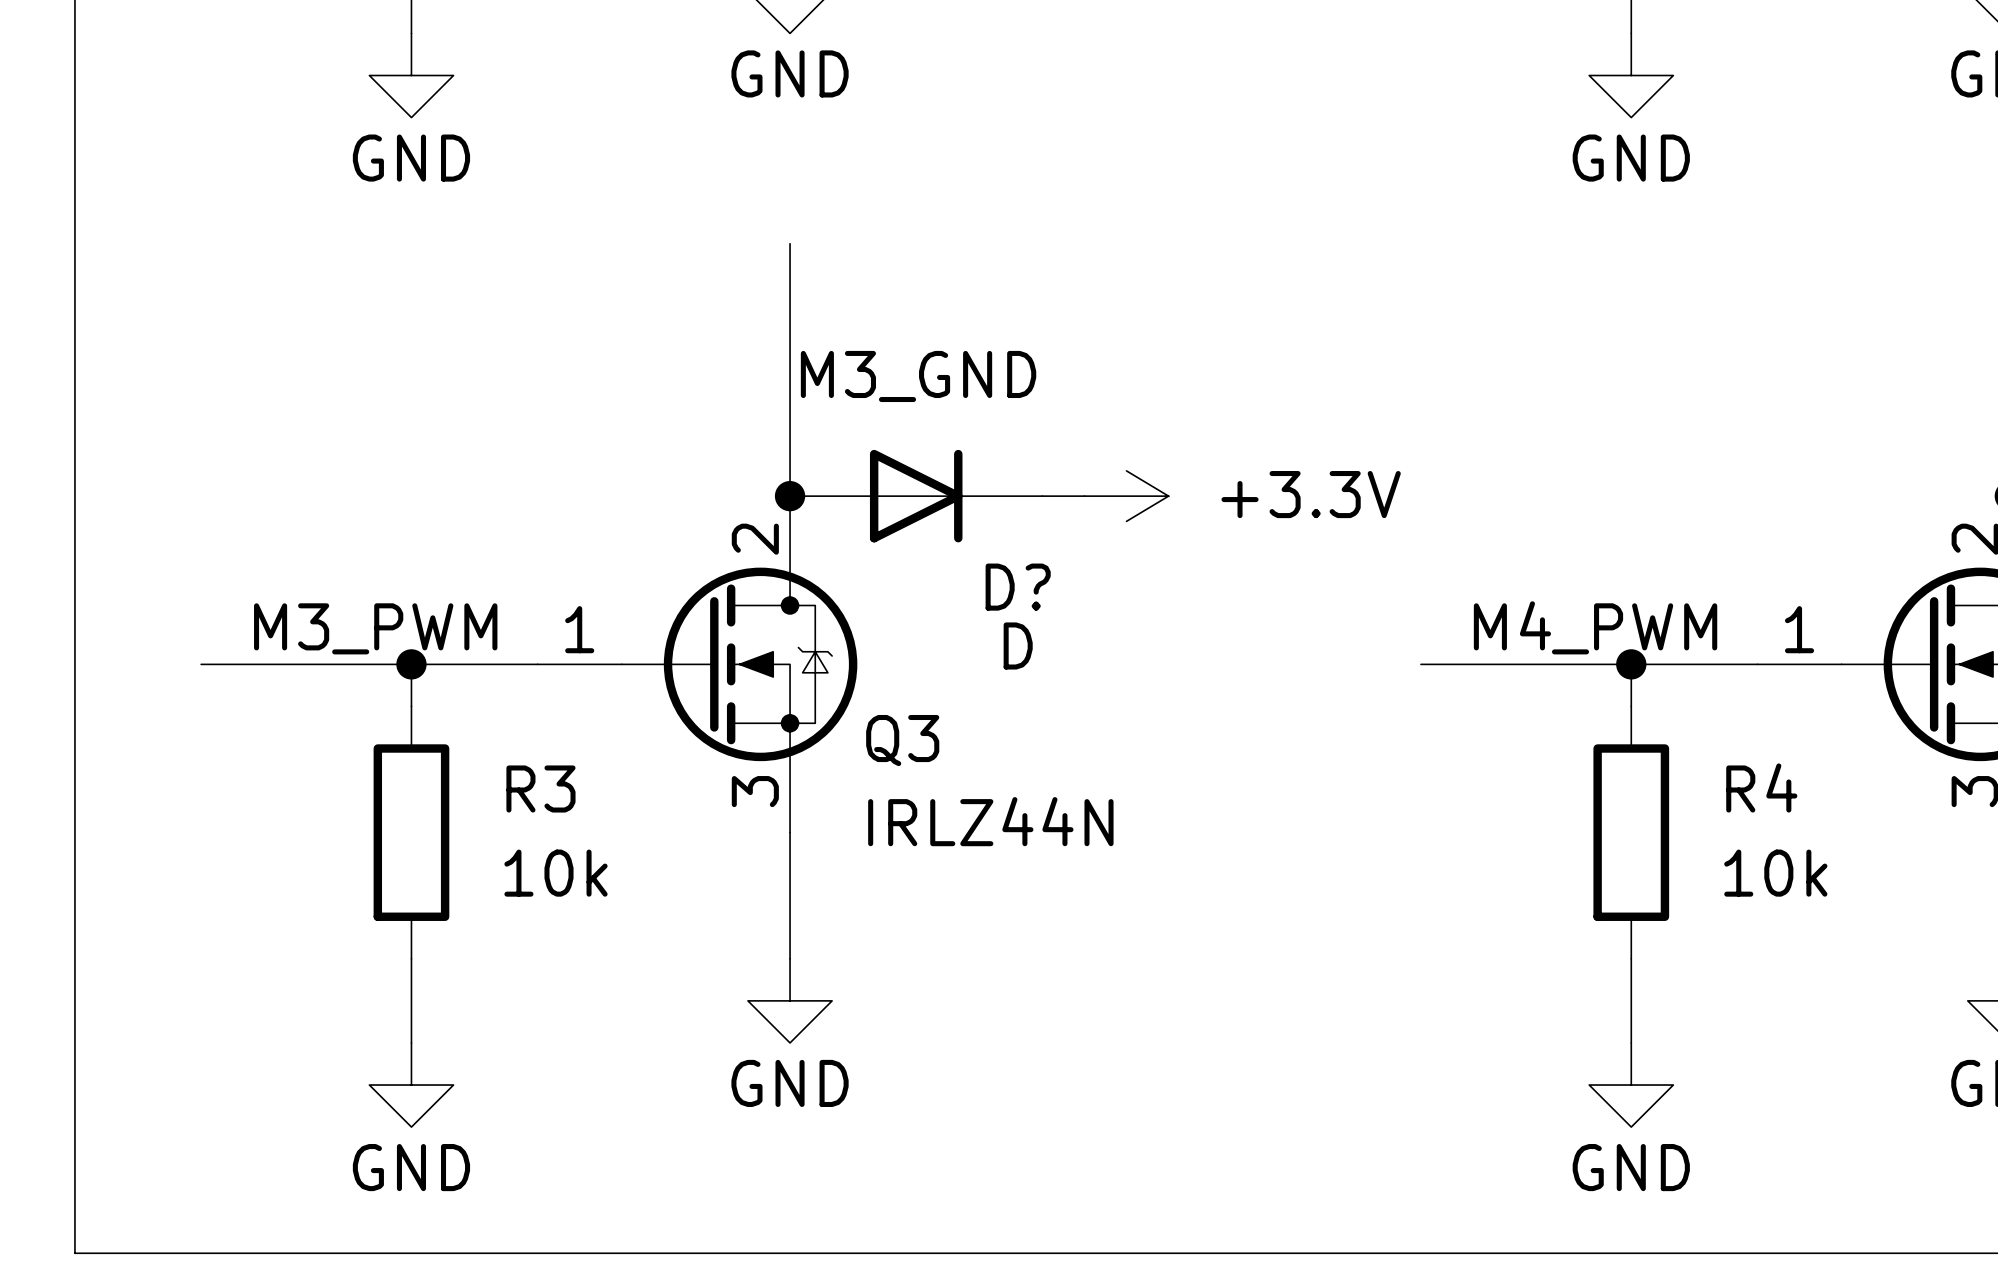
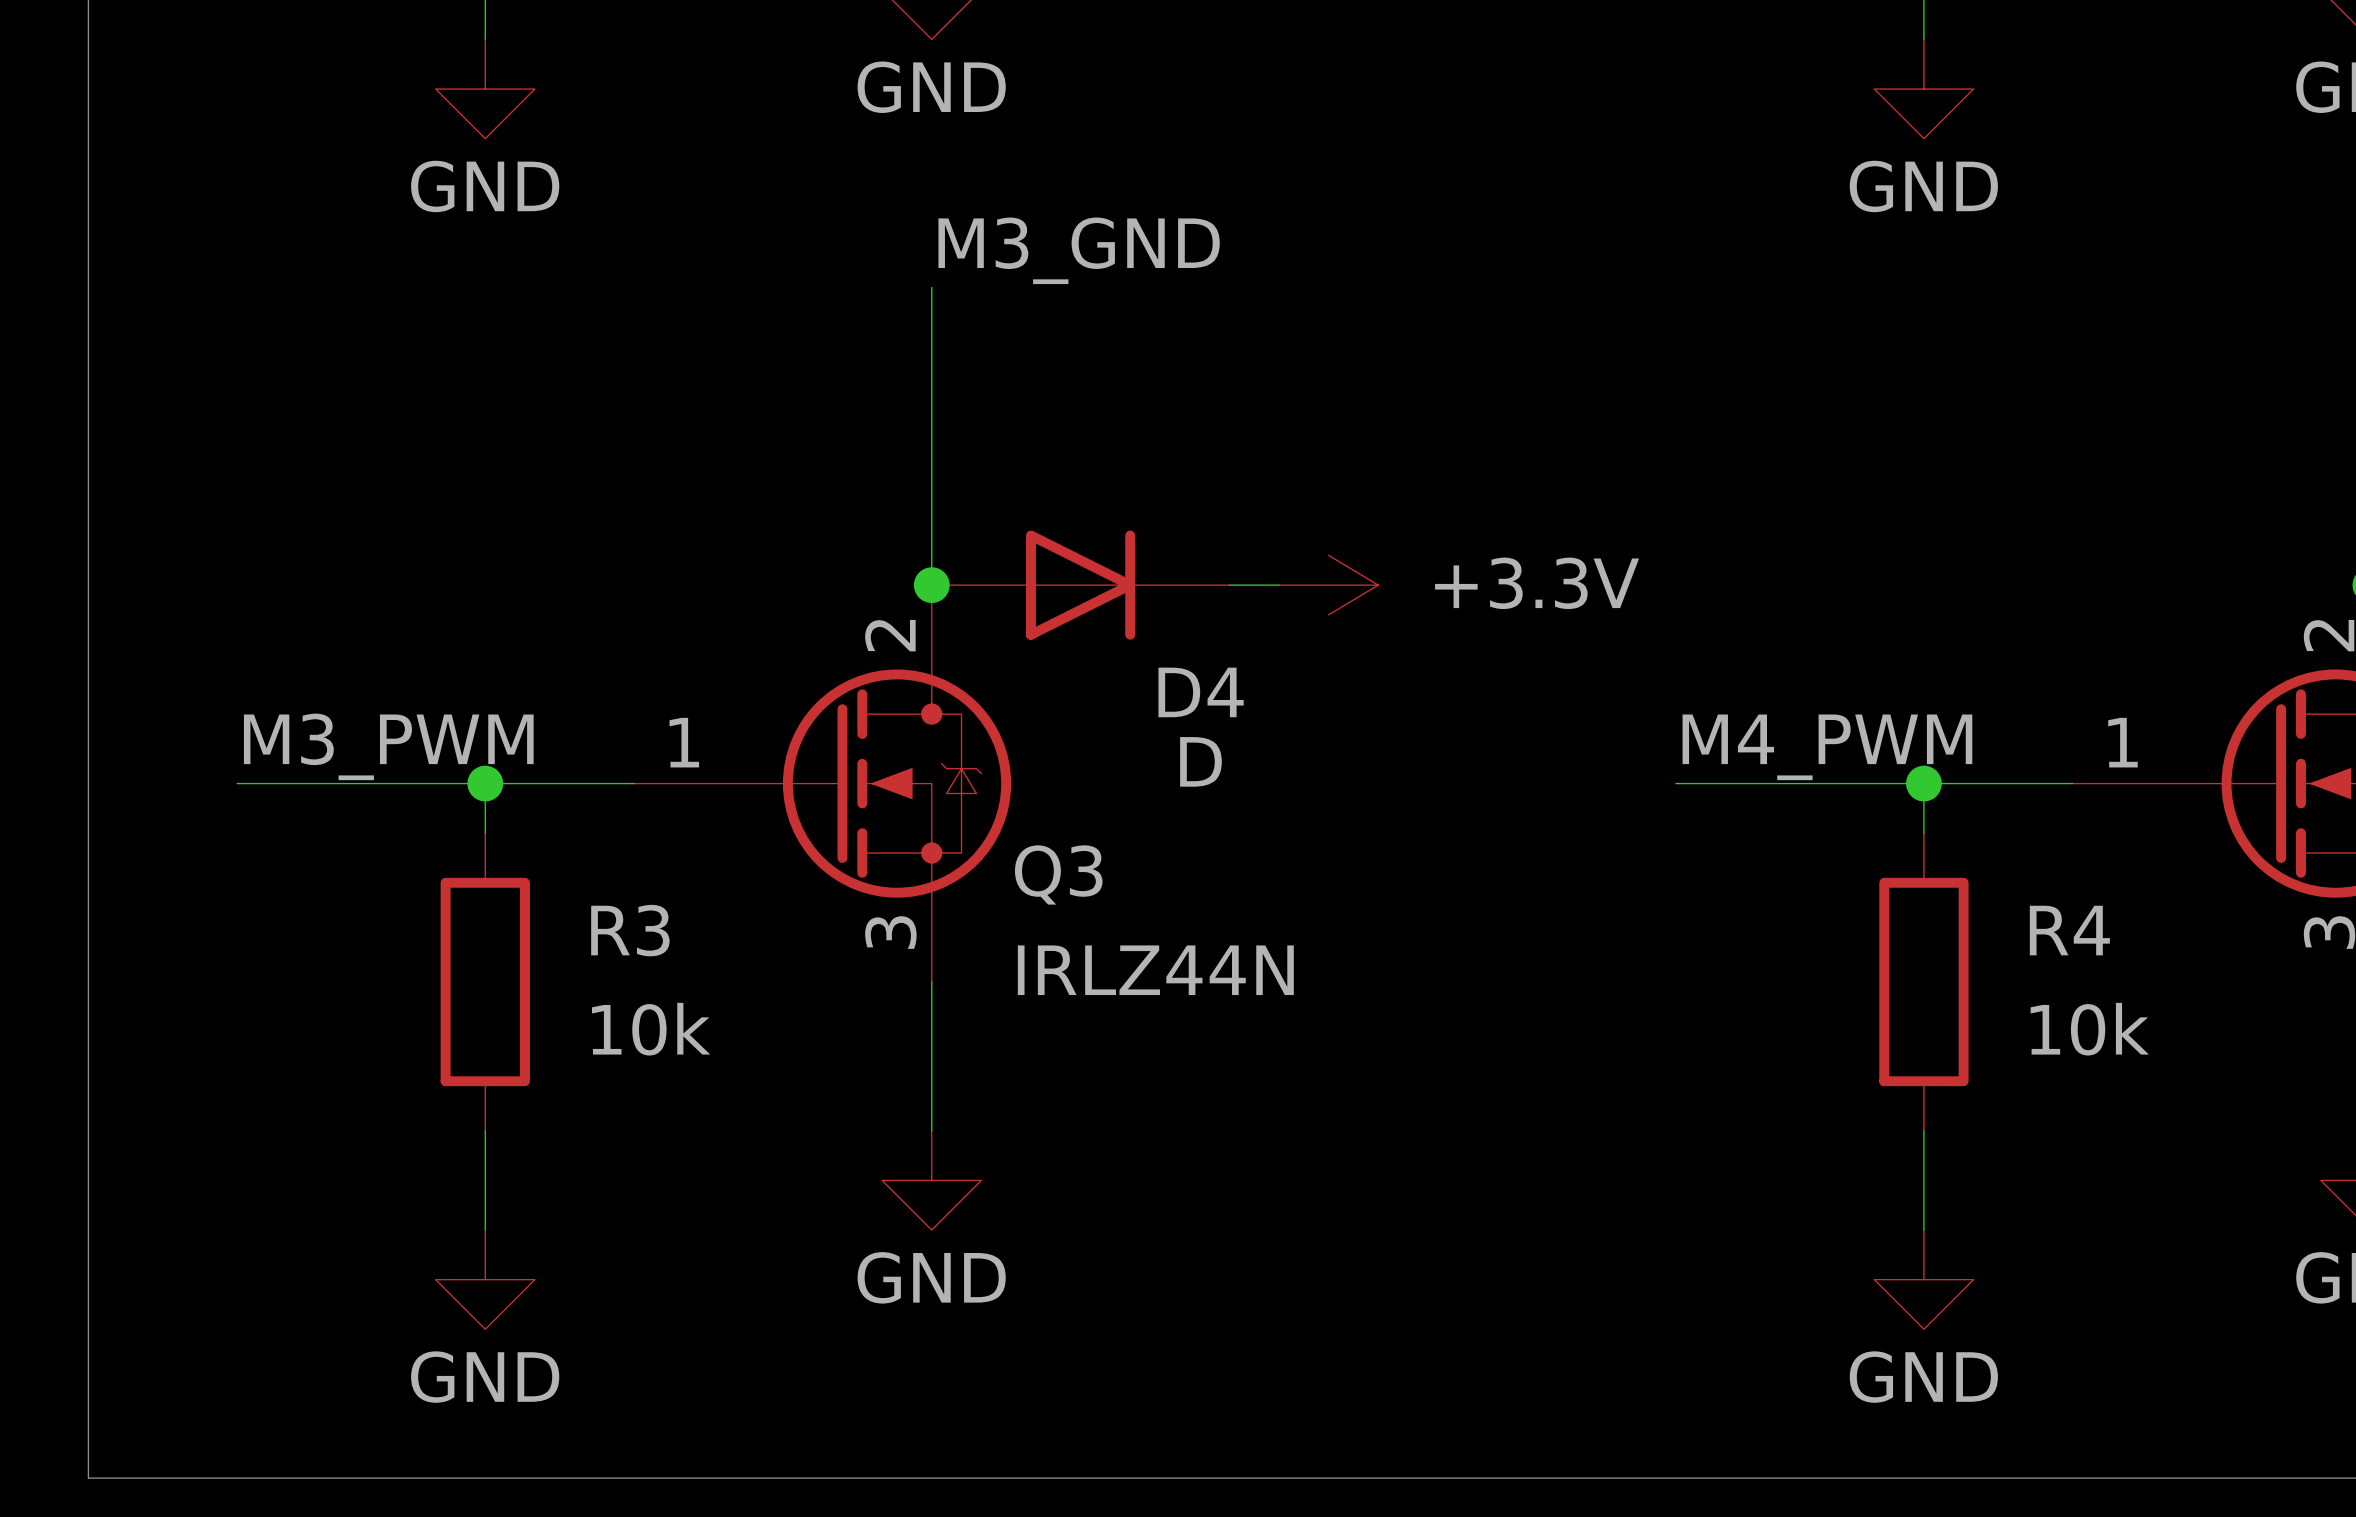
label position: M3_GND (918, 376) -> M3_GND (1079, 250)
D? name: D? (1018, 587) -> D4 (1201, 692)
label position: M4_PWM (1595, 627) -> M4_PWM (1827, 747)
label position: M3_PWM (375, 628) -> M3_PWM (388, 746)

